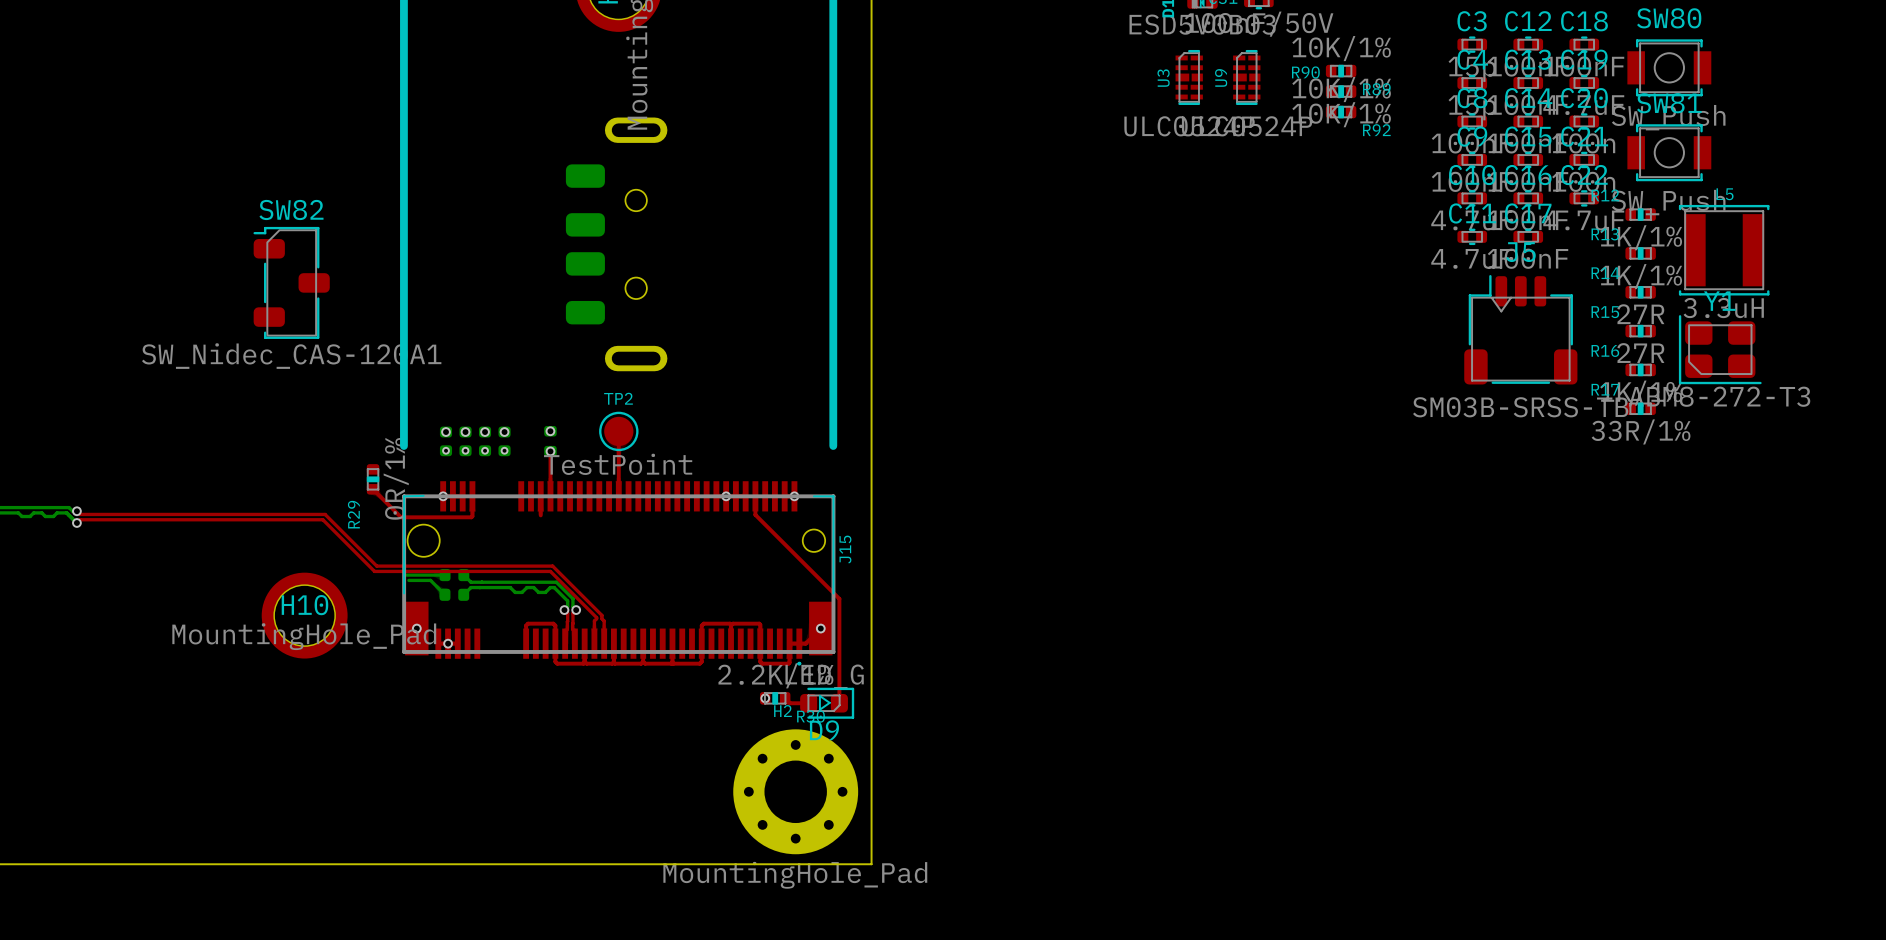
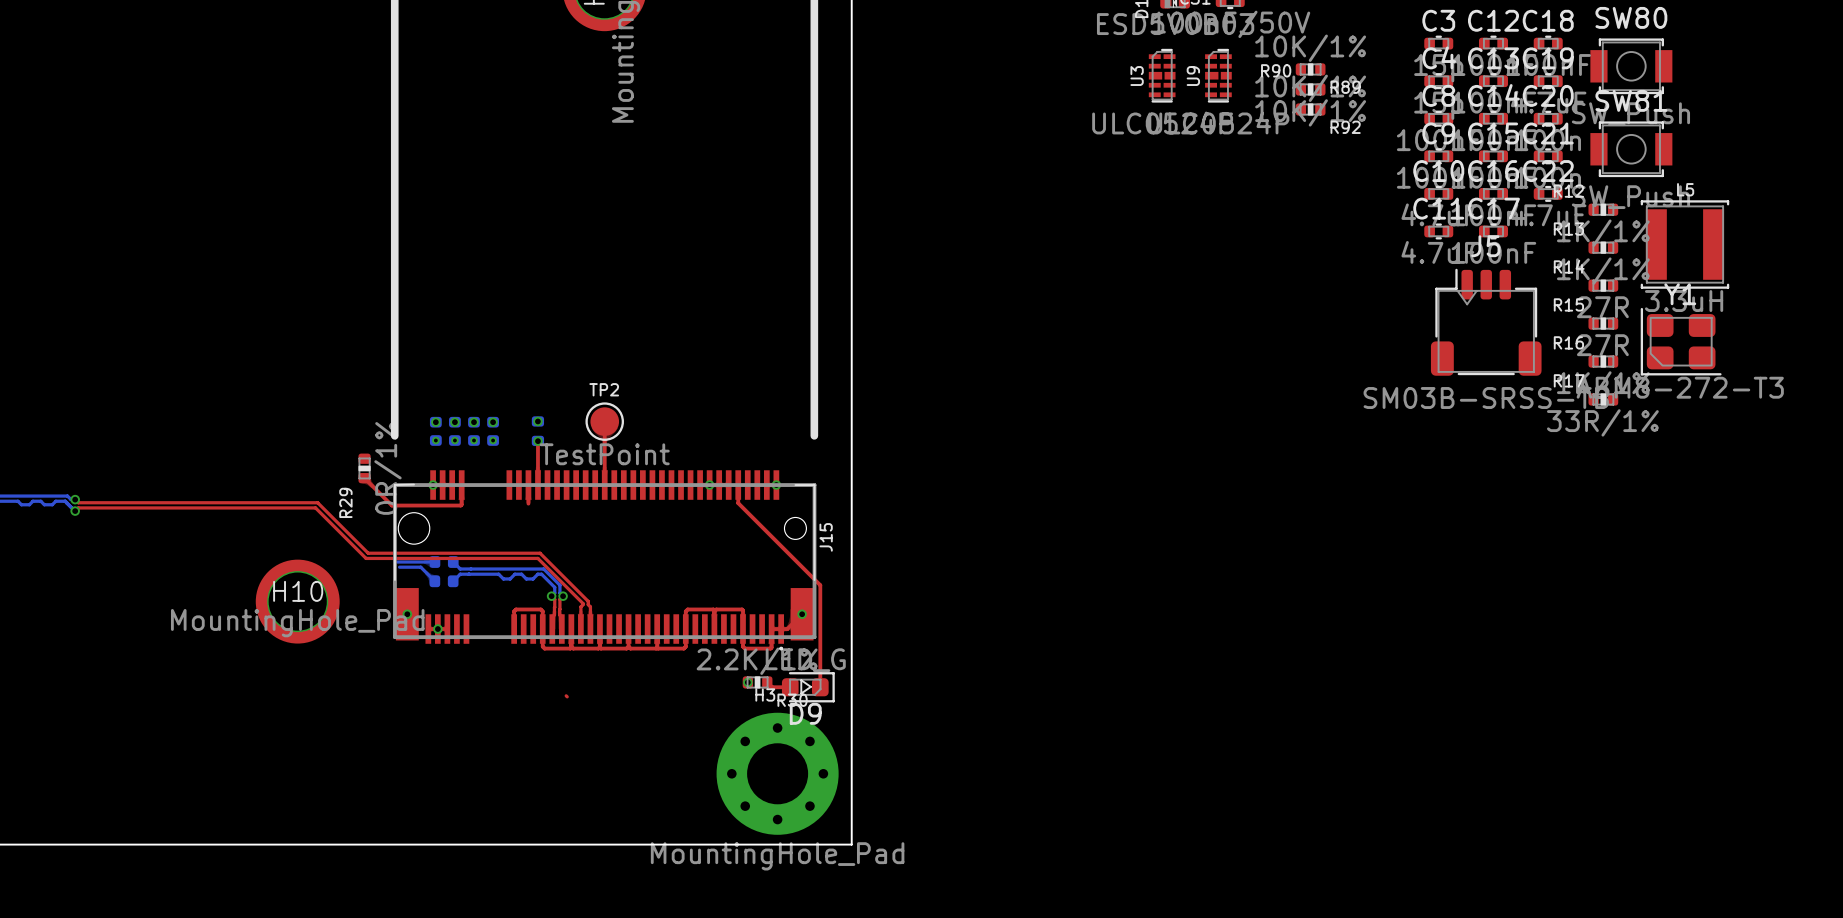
part: (616, 244) -> none
SW82: SW_Nidec_CAS-120A1 (291, 282) -> none
H2 name: H2 (782, 711) -> H3 (765, 694)
top track: none -> (566, 695) (567, 696)

